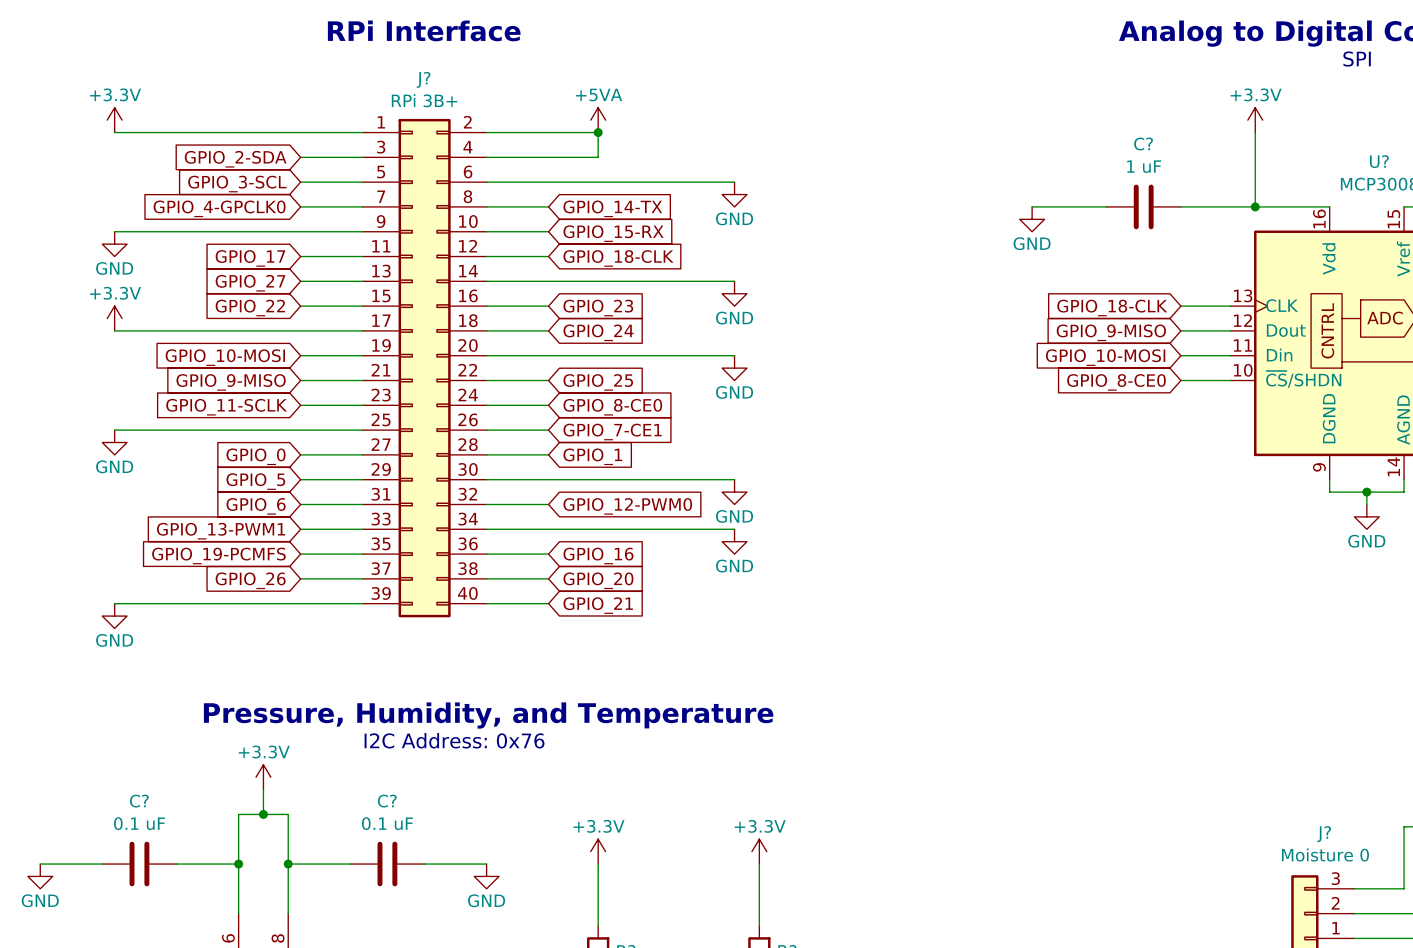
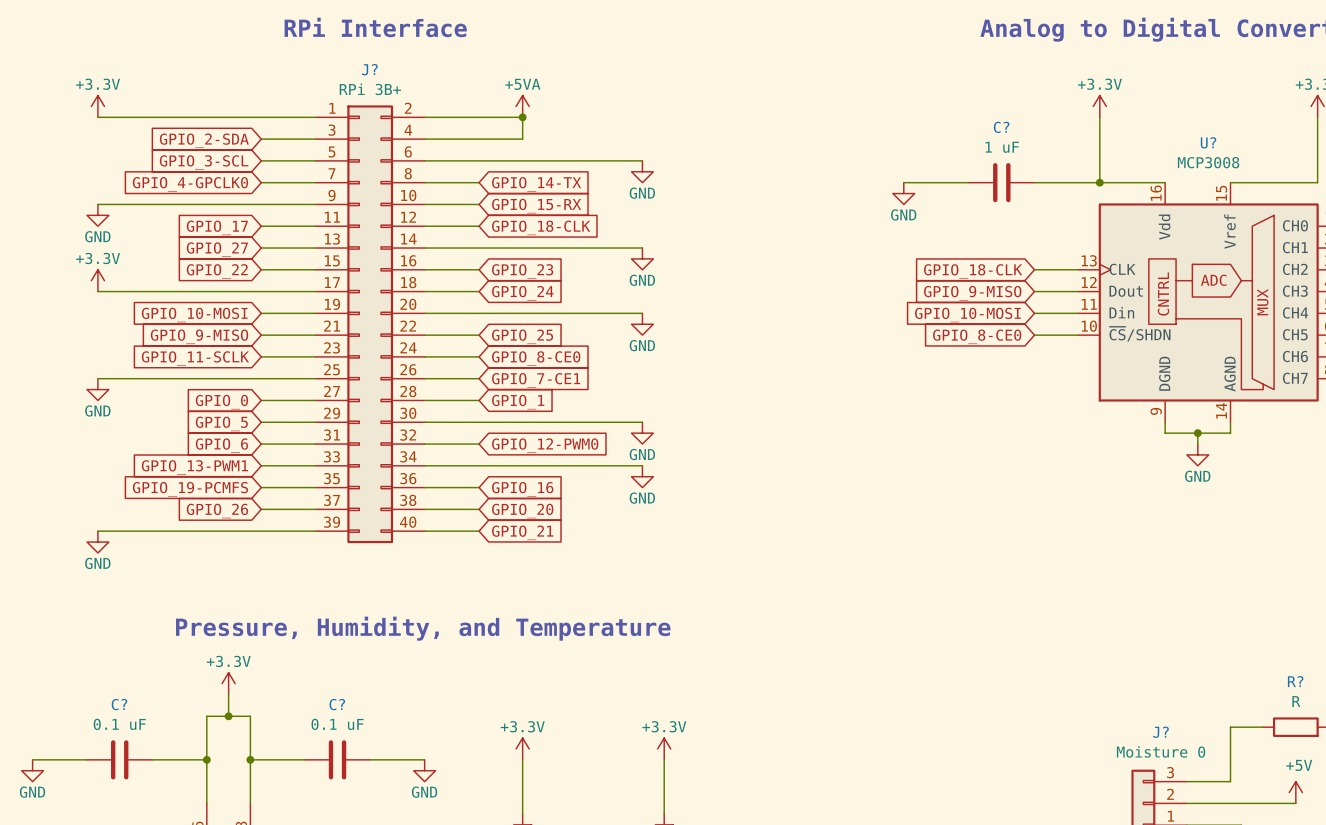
text: SPI (1357, 59) -> none
text: I2C Address: 0x76 (454, 740) -> none

